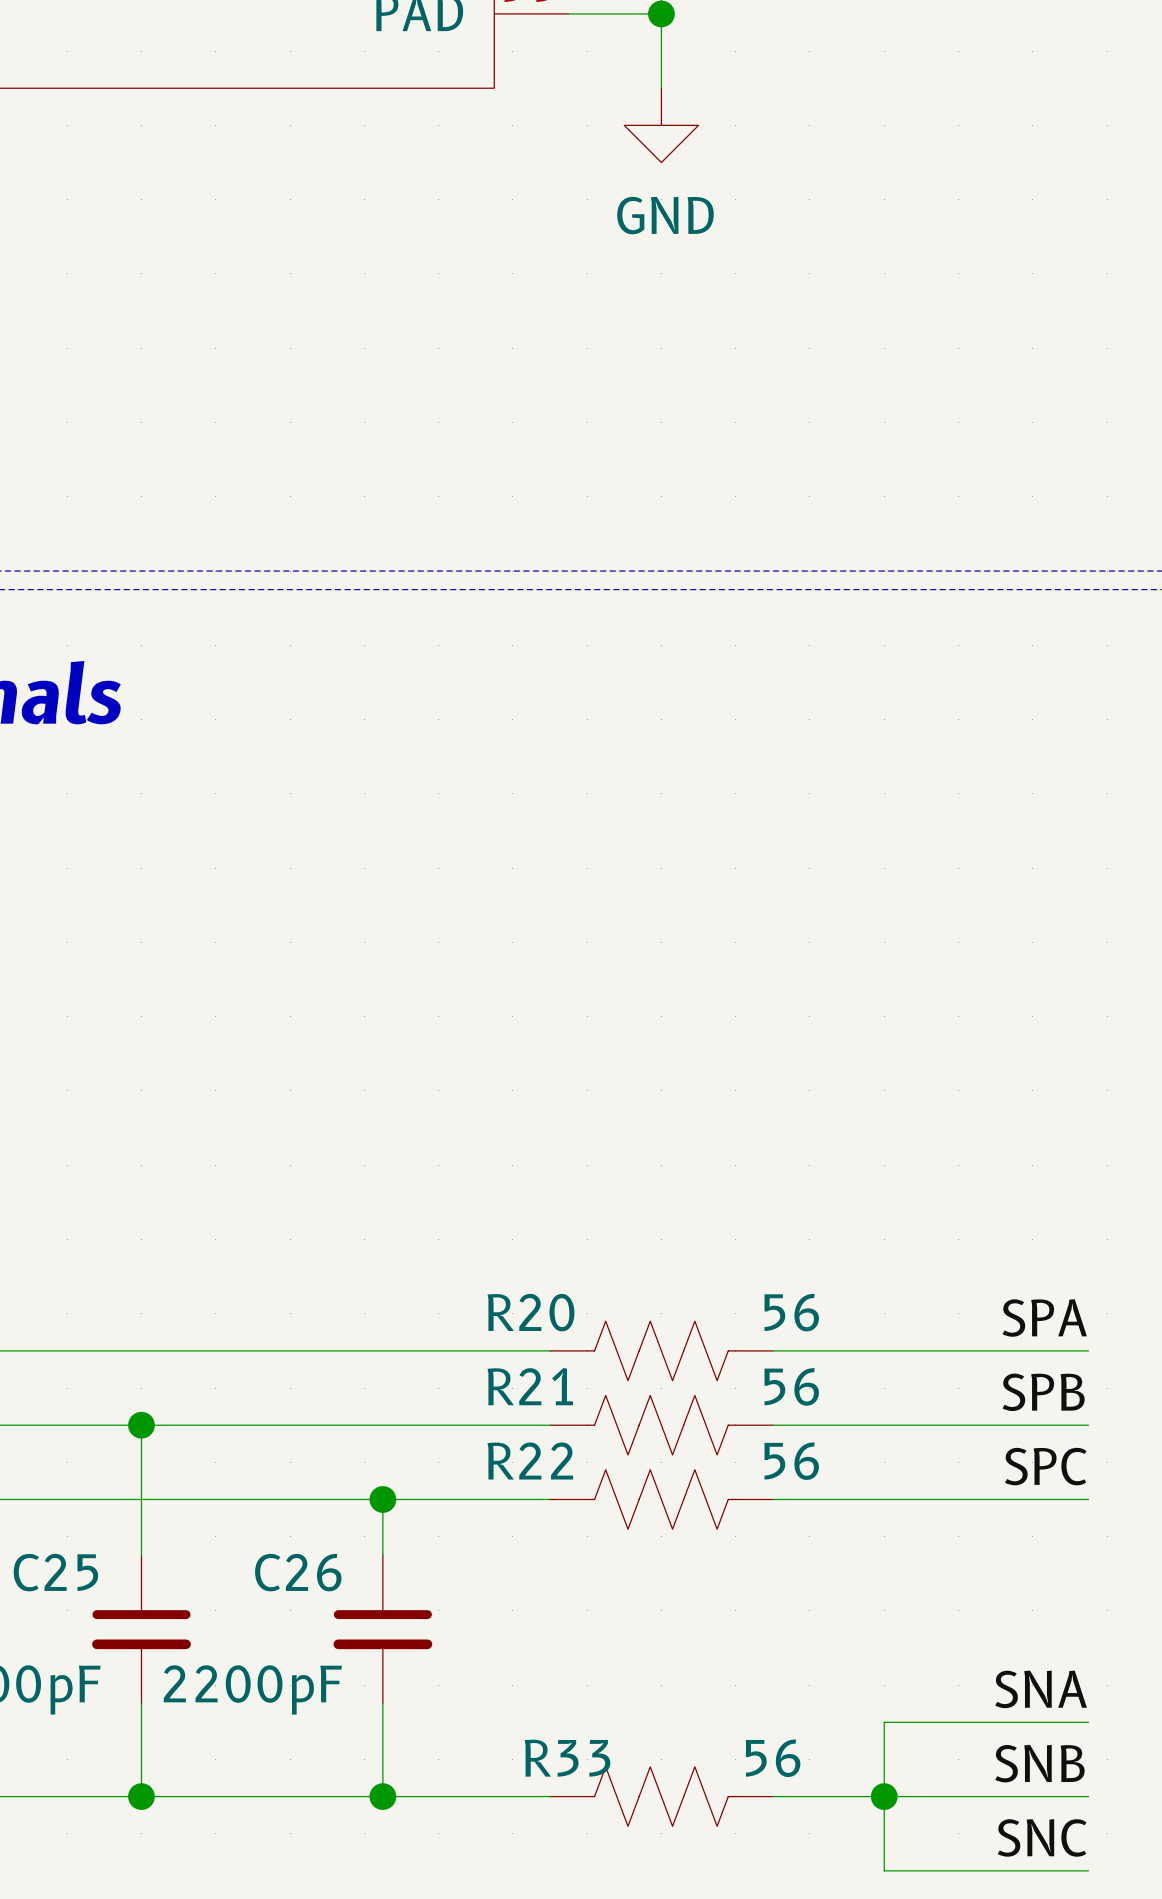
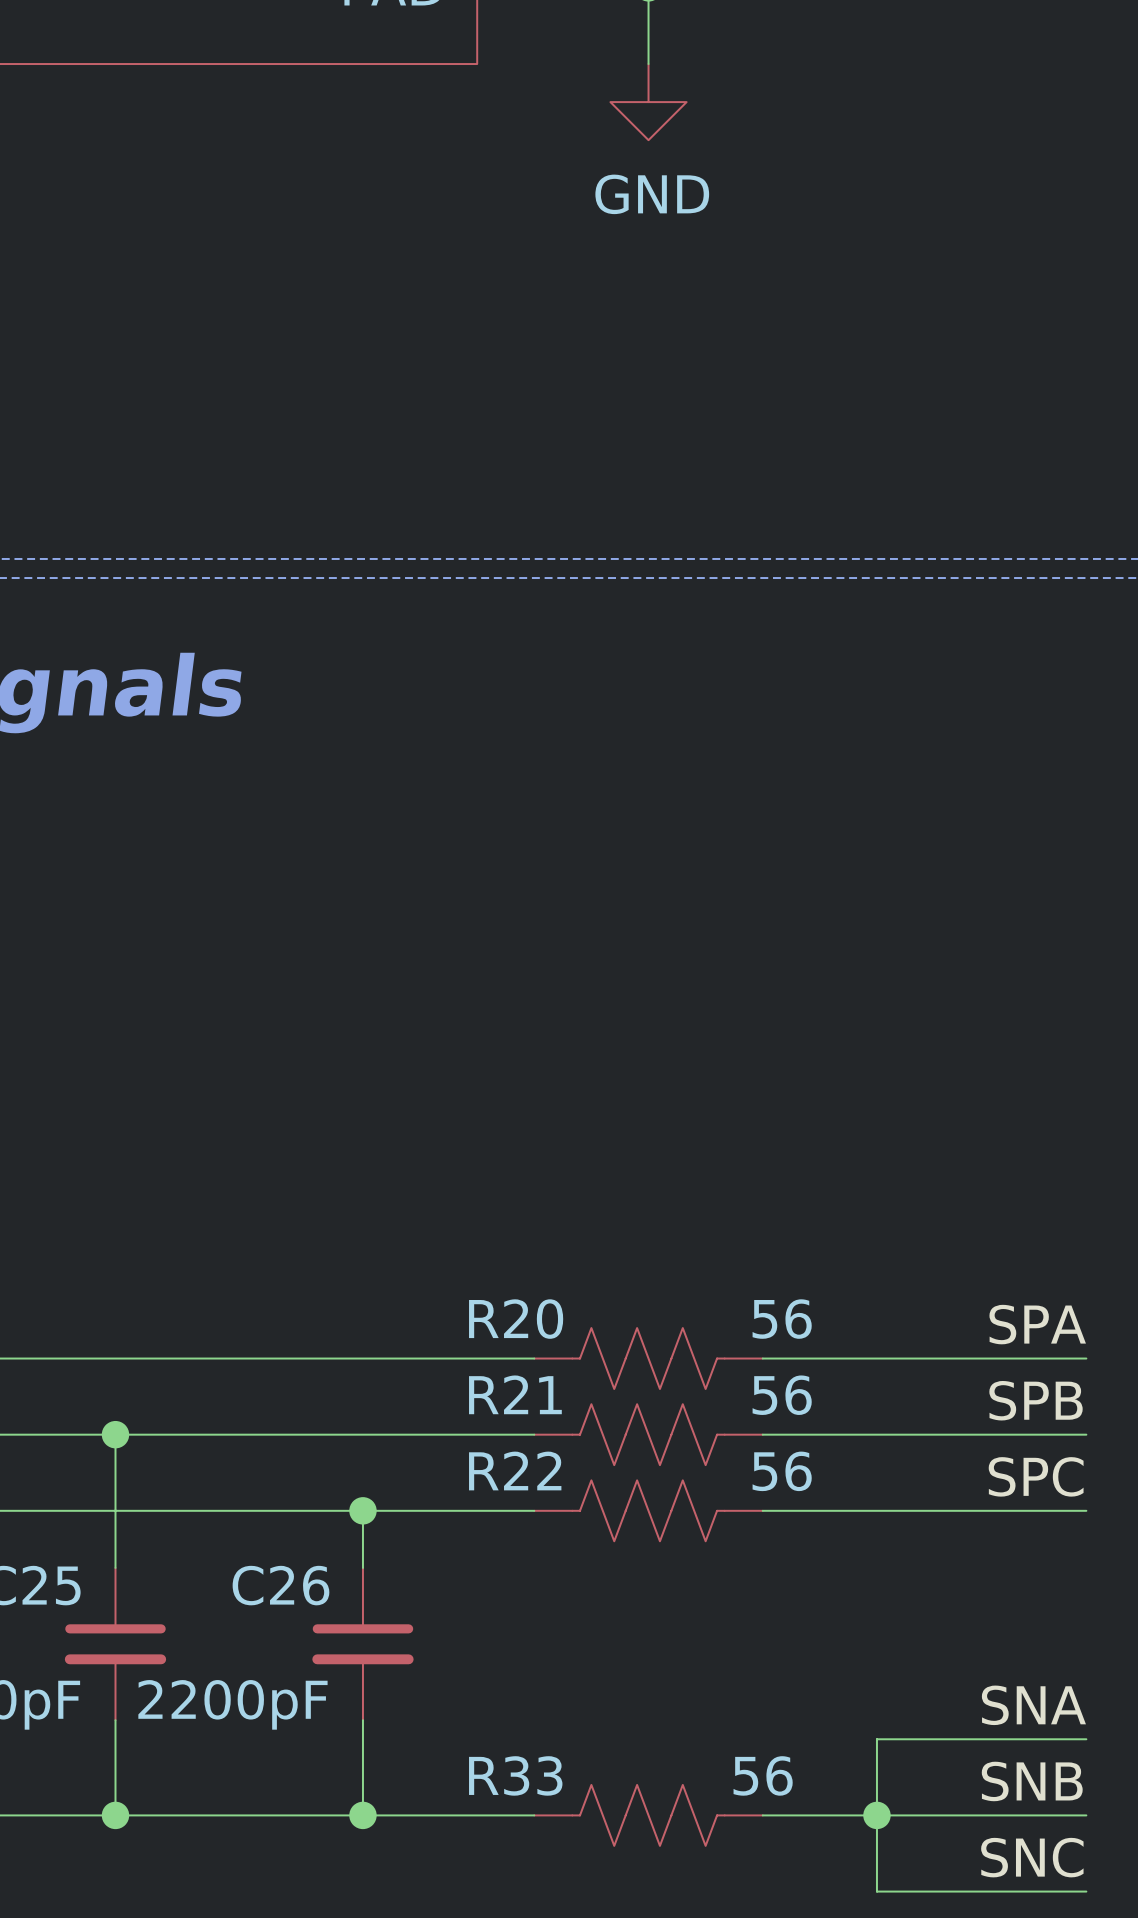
R33 name position: R33 (567, 1758) -> R33 (515, 1775)

